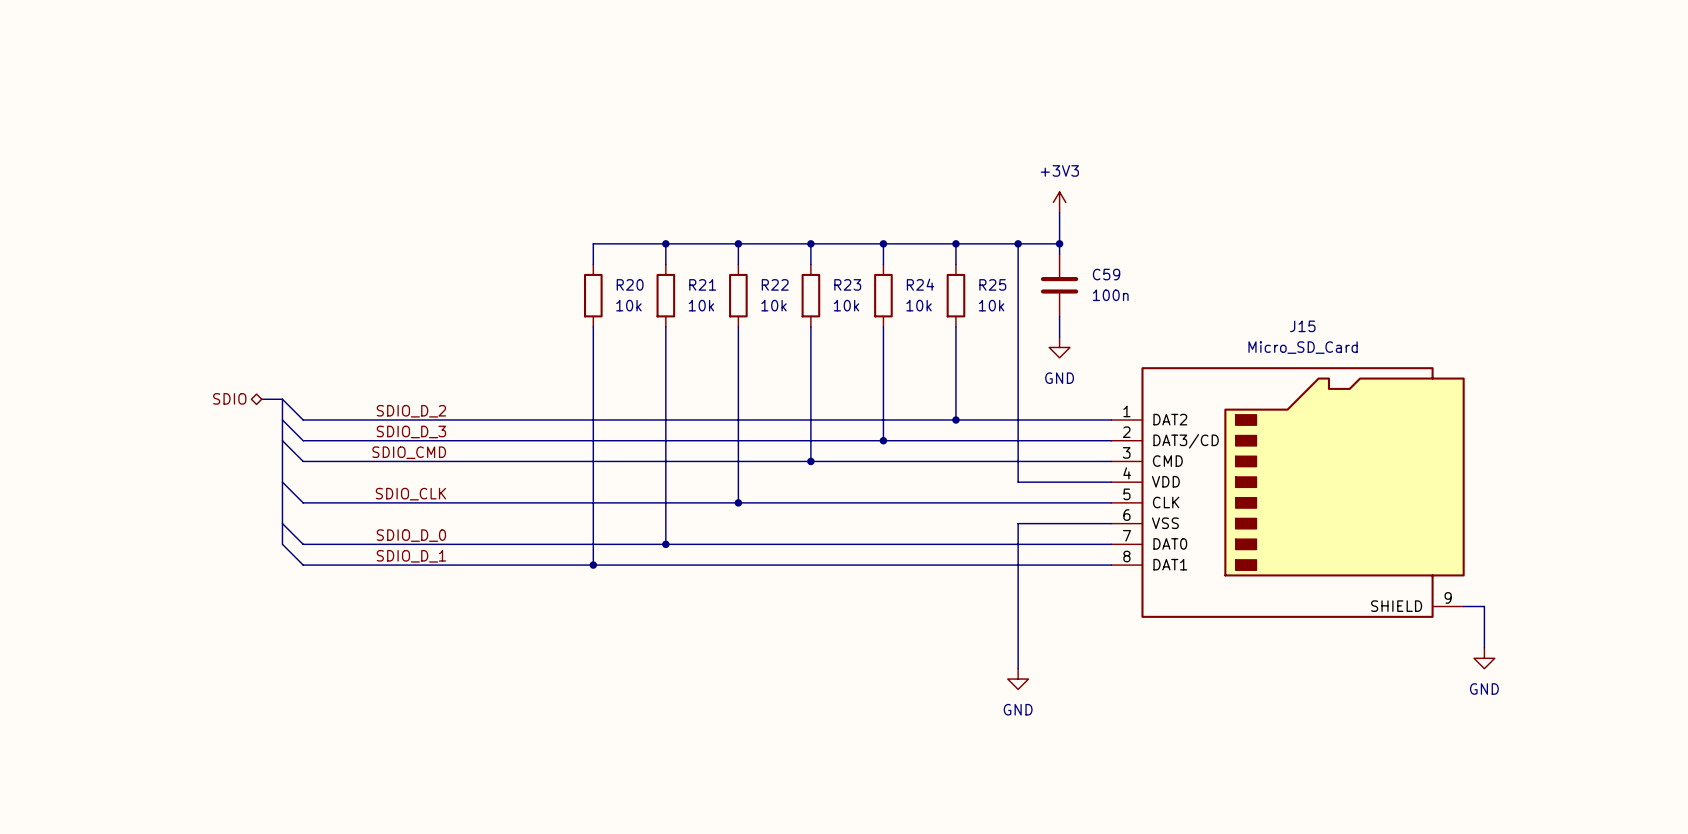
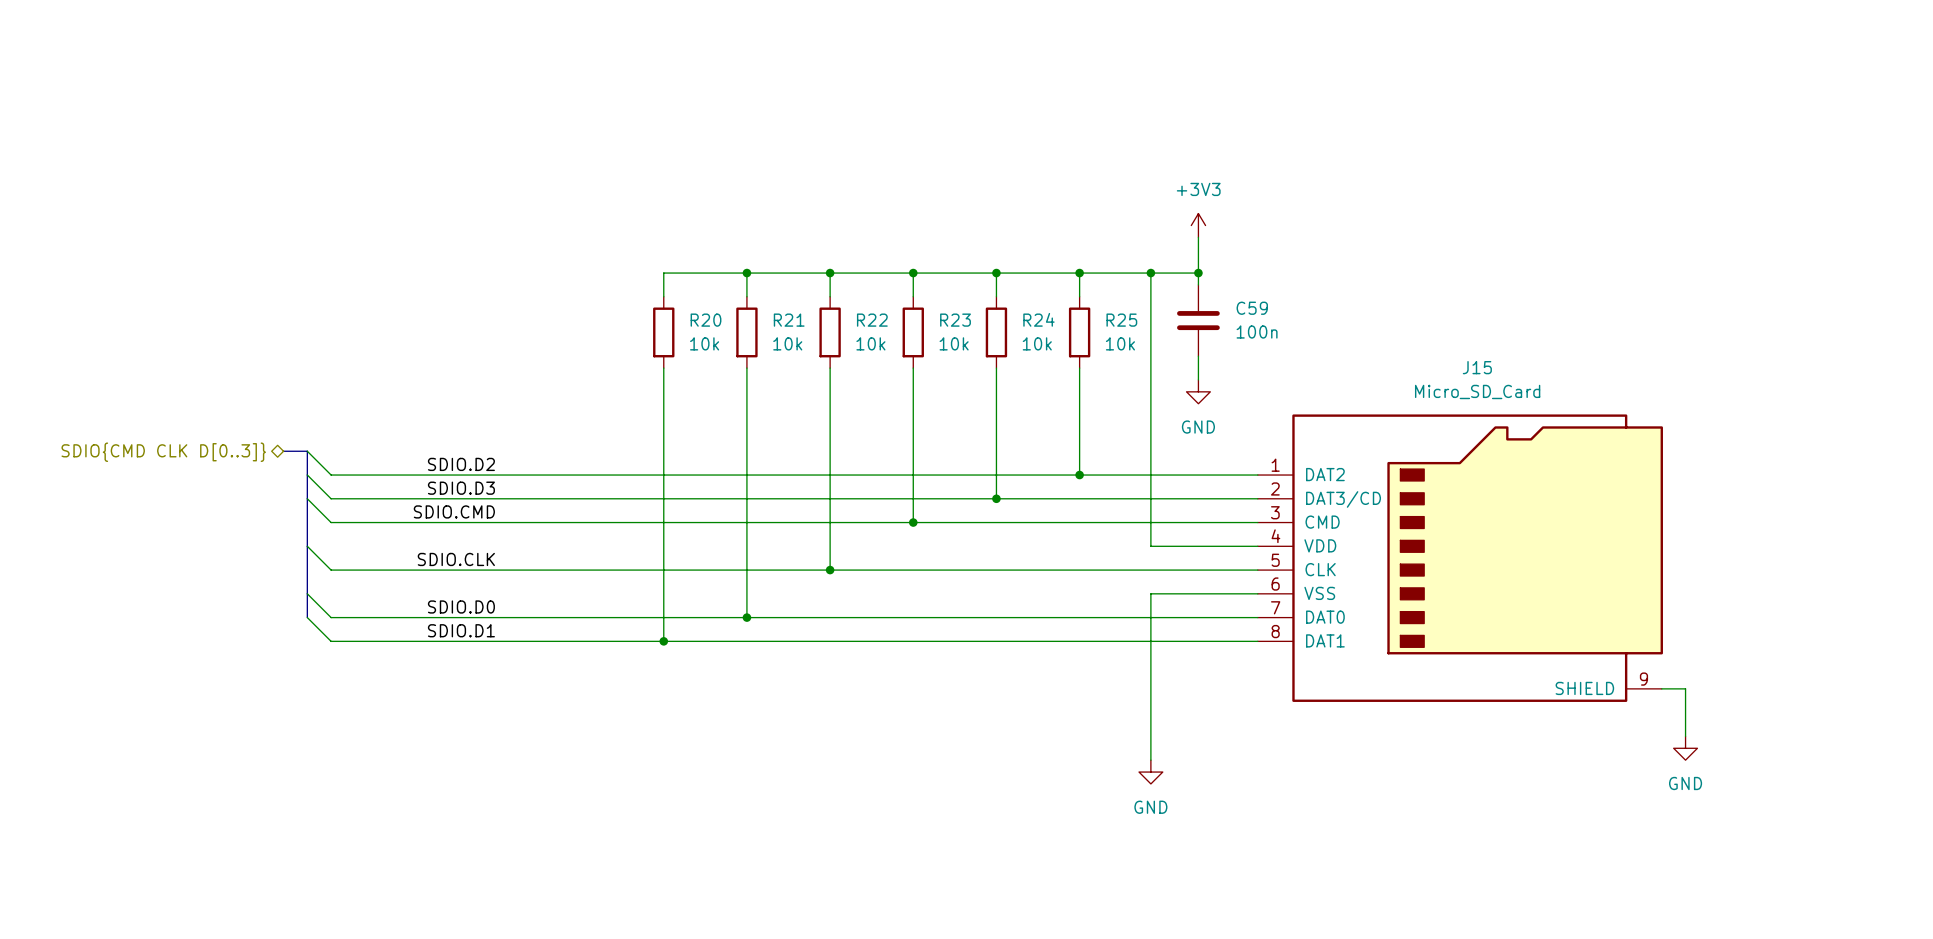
hierarchical label: SDIO (229, 398) -> SDIO{CMD CLK D[0..3]} (163, 452)
label: SDIO_D_2 (411, 411) -> SDIO.D2 (461, 464)
label: SDIO_D_3 (411, 431) -> SDIO.D3 (461, 488)
label: SDIO_CMD (409, 452) -> SDIO.CMD (454, 511)
label: SDIO_CLK (410, 494) -> SDIO.CLK (456, 559)
label: SDIO_D_0 (411, 535) -> SDIO.D0 (461, 606)
label: SDIO_D_1 (411, 556) -> SDIO.D1 (461, 630)

